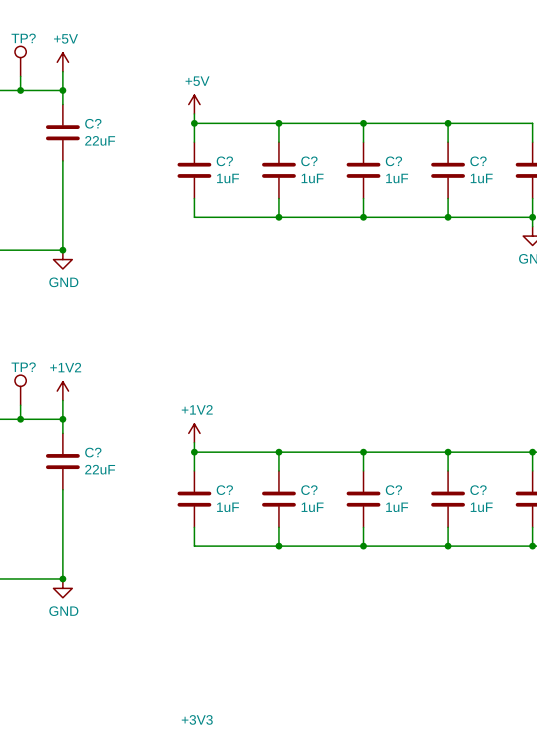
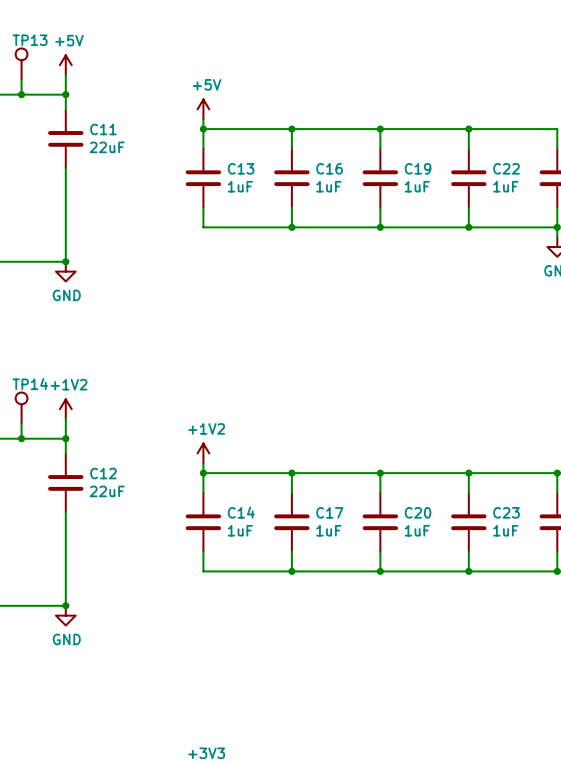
TP? name: TP? (23, 38) -> TP13 (30, 40)
C? name: C? (93, 123) -> C11 (103, 129)
C? name: C? (224, 161) -> C13 (241, 168)
C? name: C? (309, 161) -> C16 (329, 168)
C? name: C? (393, 161) -> C19 (418, 168)
C? name: C? (478, 161) -> C22 (506, 168)
TP? name: TP? (23, 367) -> TP14 (30, 384)
C? name: C? (93, 452) -> C12 (103, 473)
C? name: C? (224, 490) -> C14 (241, 512)
C? name: C? (309, 490) -> C17 (329, 512)
C? name: C? (393, 490) -> C20 (418, 512)
C? name: C? (478, 490) -> C23 (506, 512)

